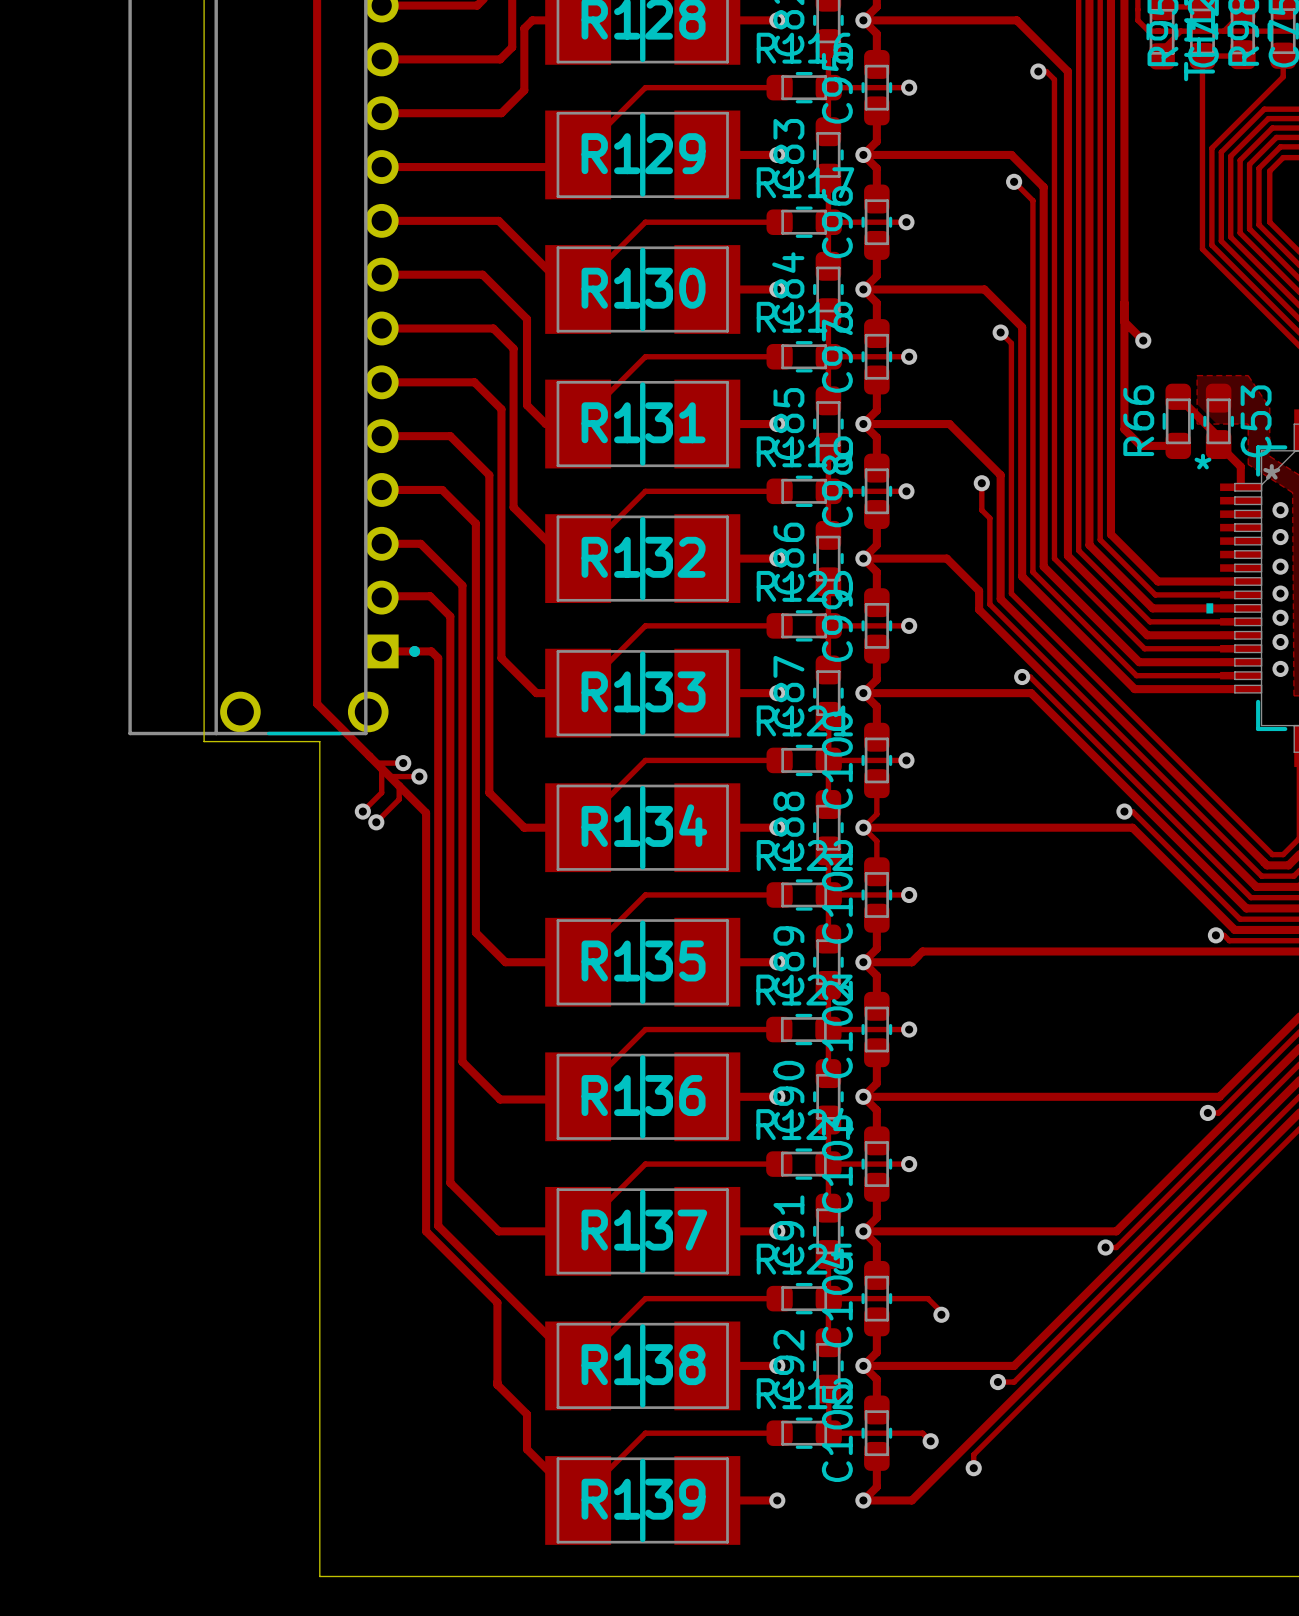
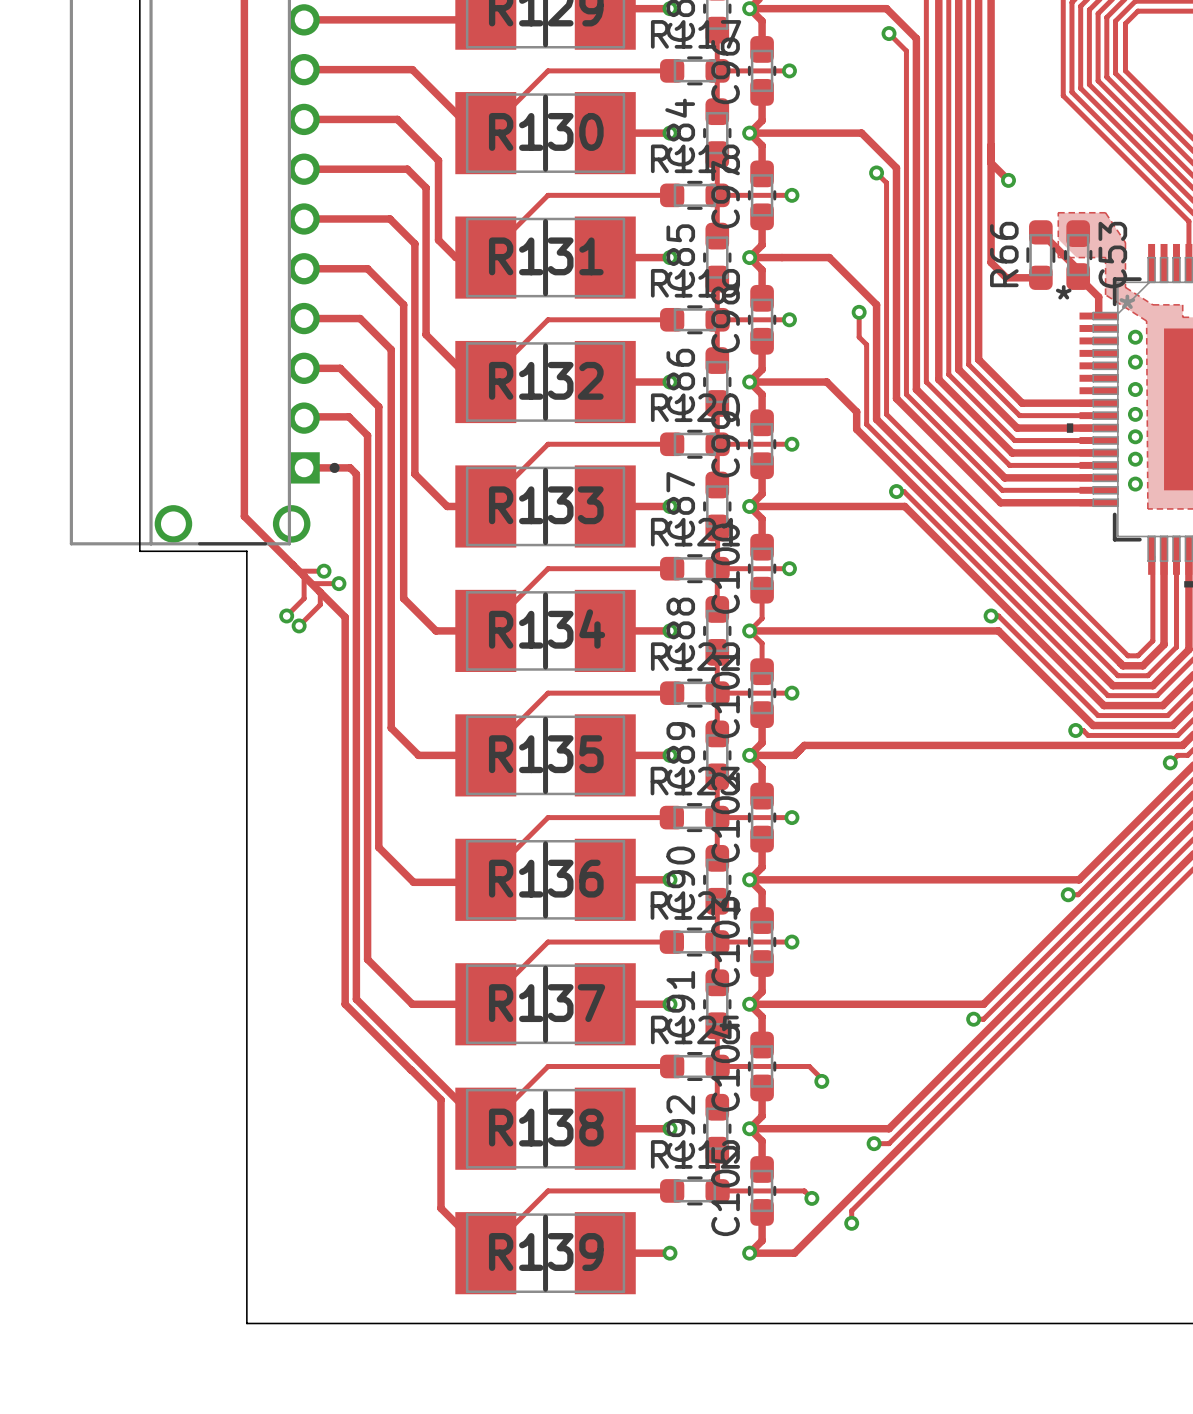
track: (497, 1302) (497, 1384) (527, 1414) (527, 1449) (529, 1452) -> (411, 1070) (441, 1099) (441, 1208)

